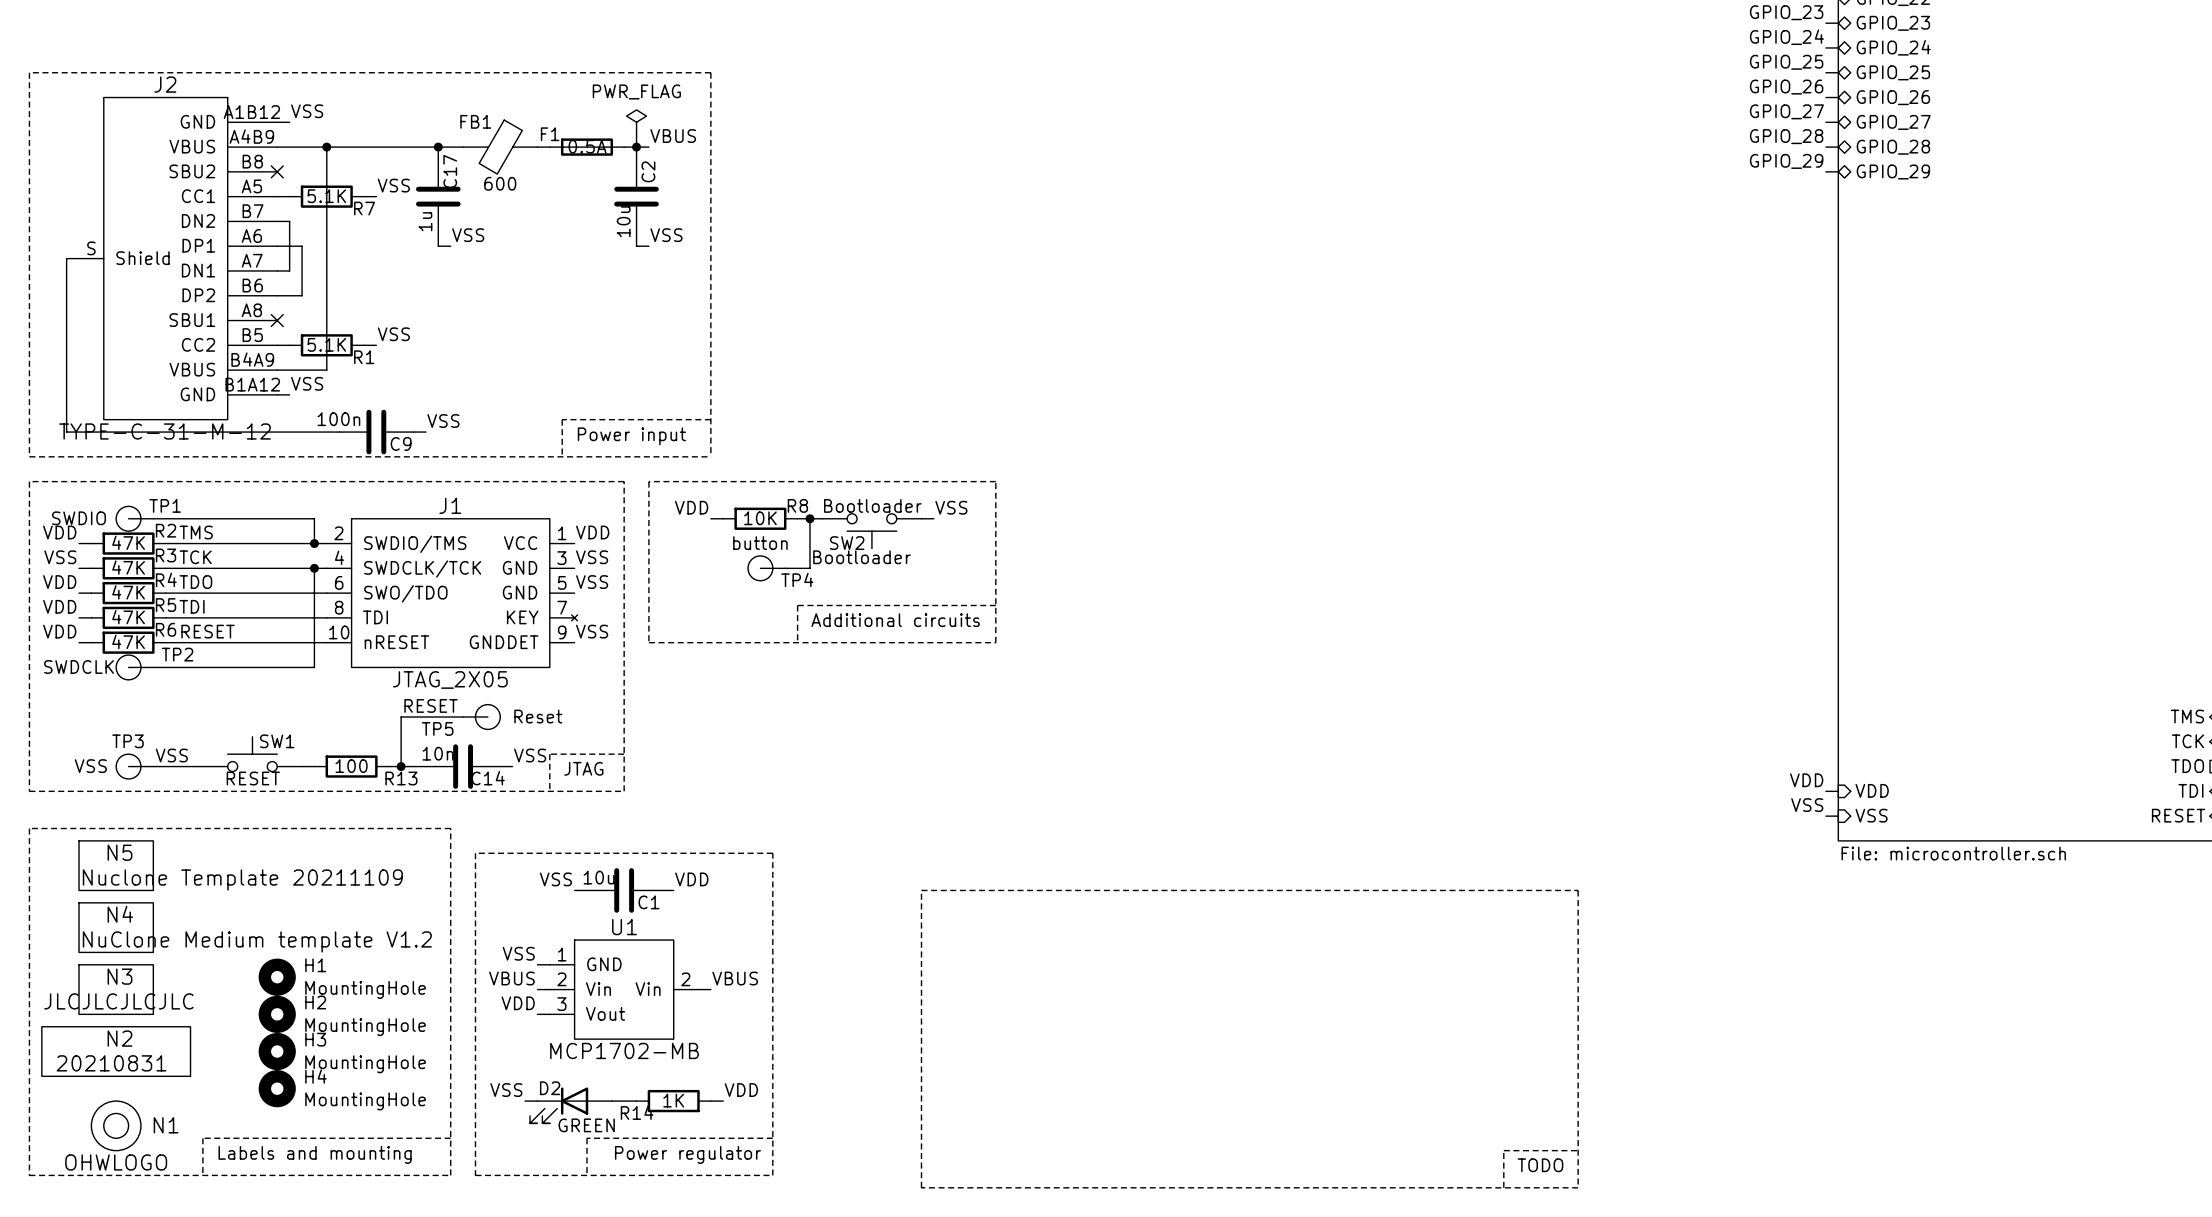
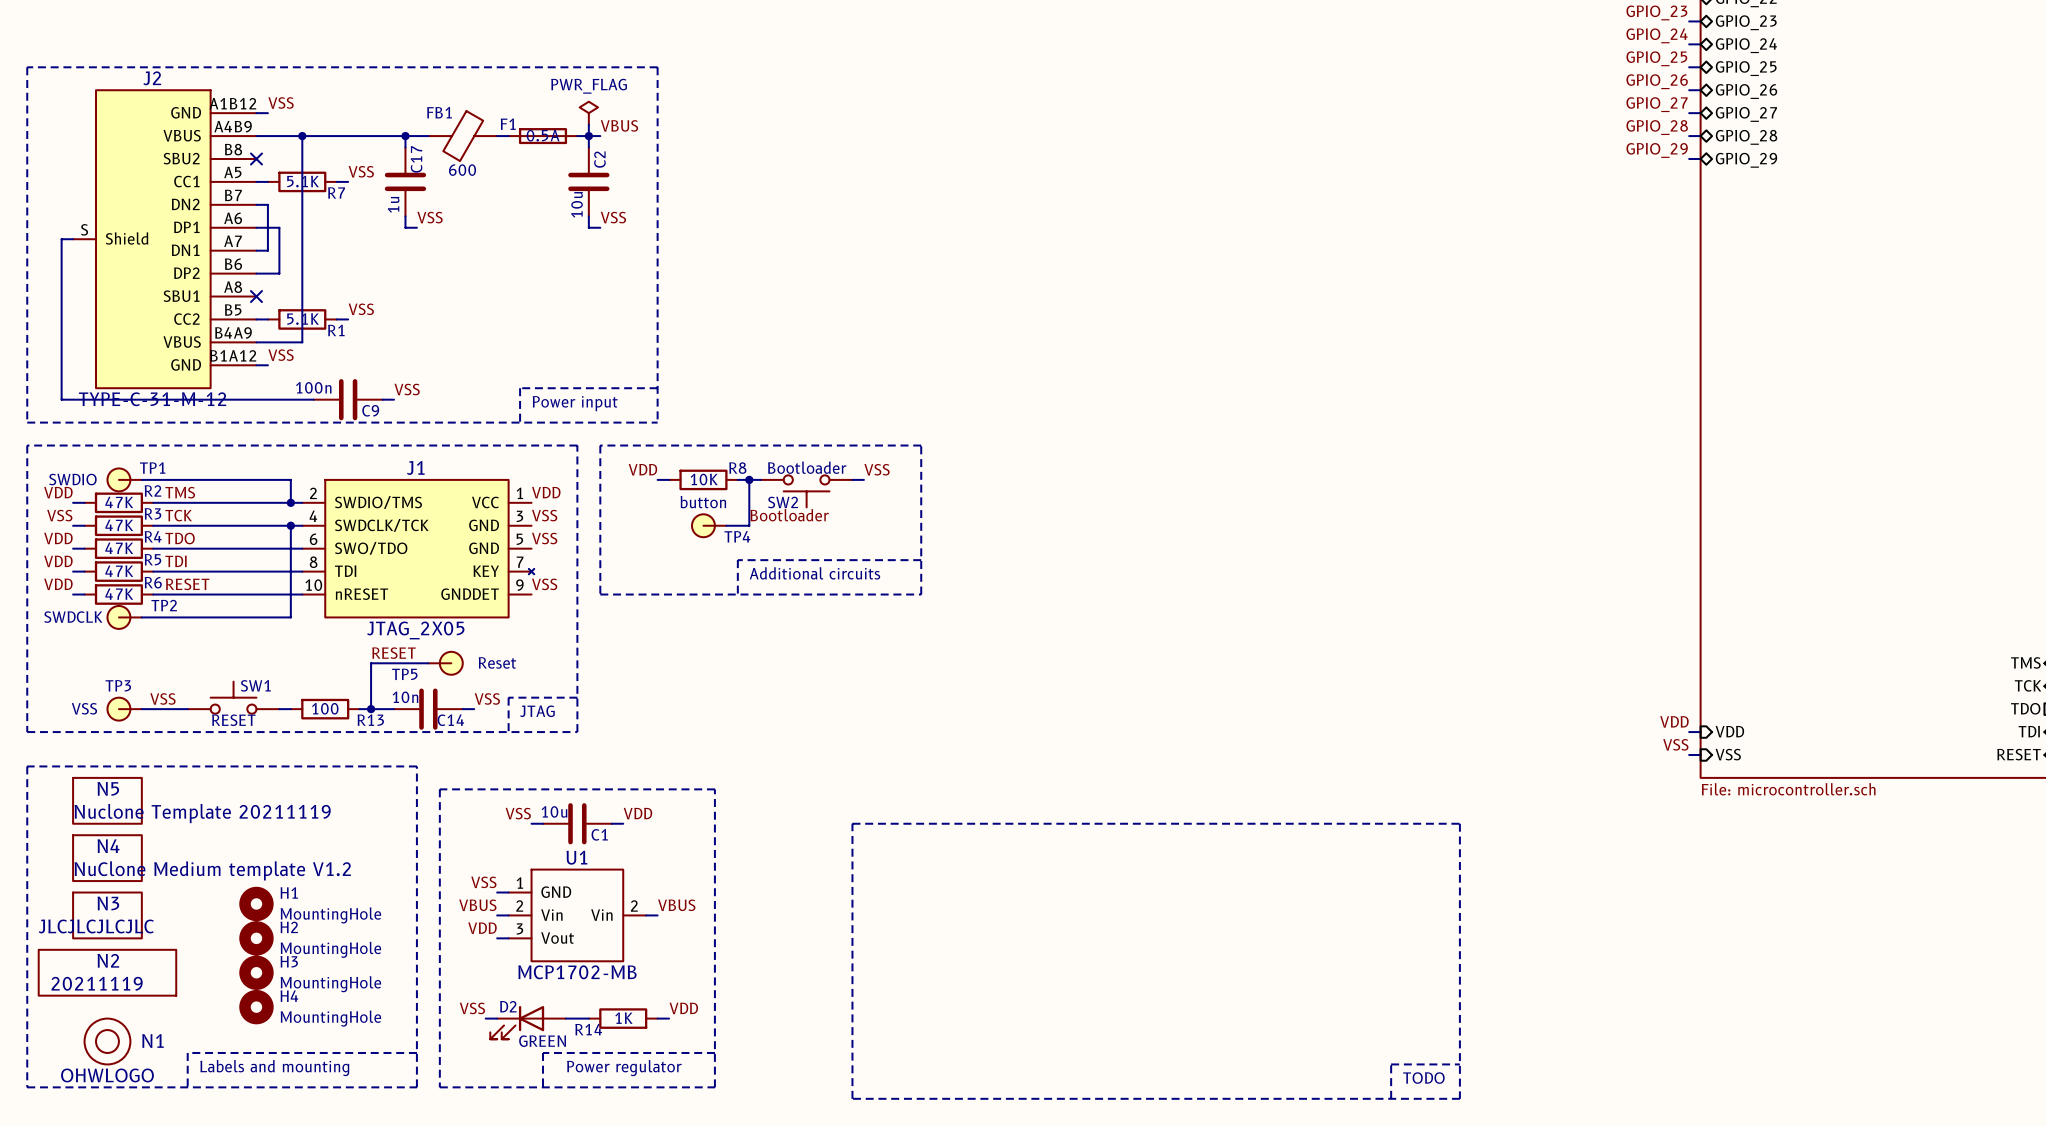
N5 value: Nuclone Template 20211109 (242, 879) -> Nuclone Template 20211119 (202, 813)
N2 value: 20210831 (111, 1063) -> 20211119 (97, 983)

